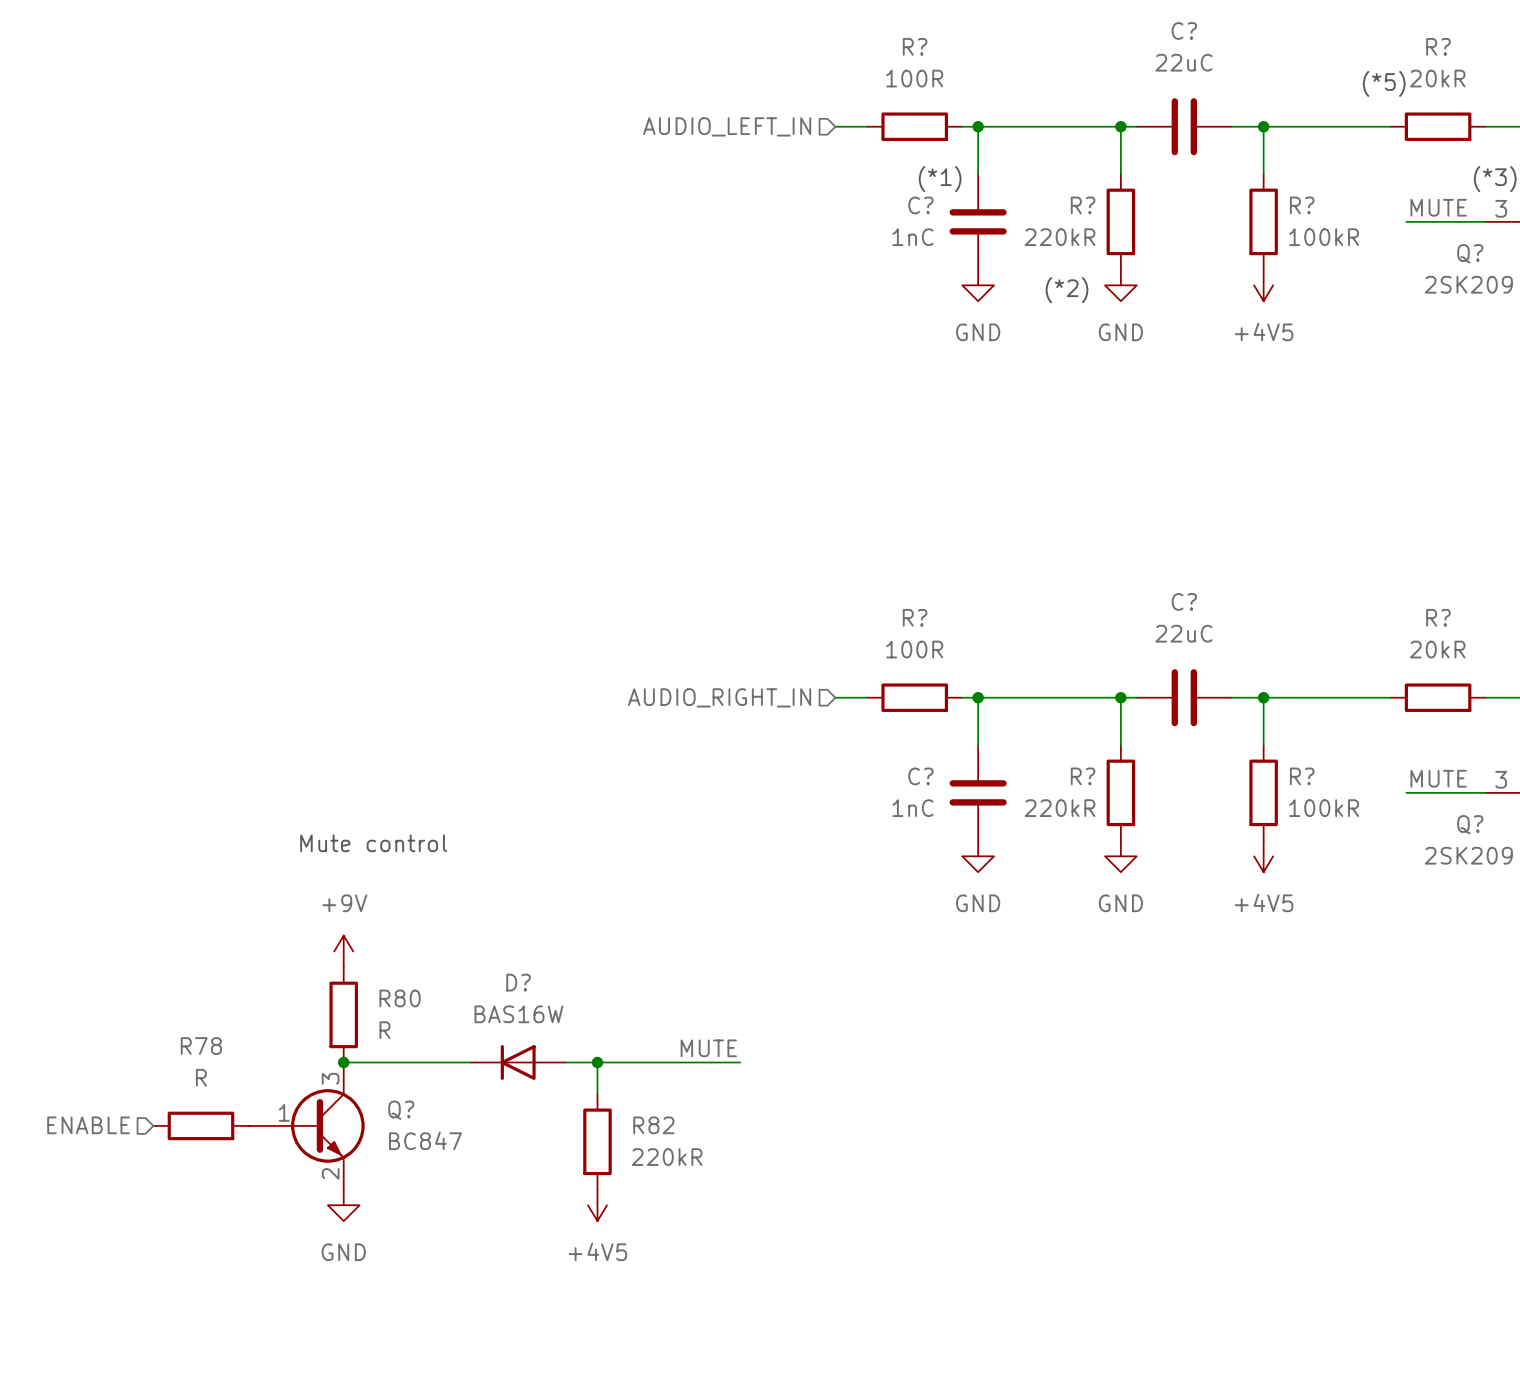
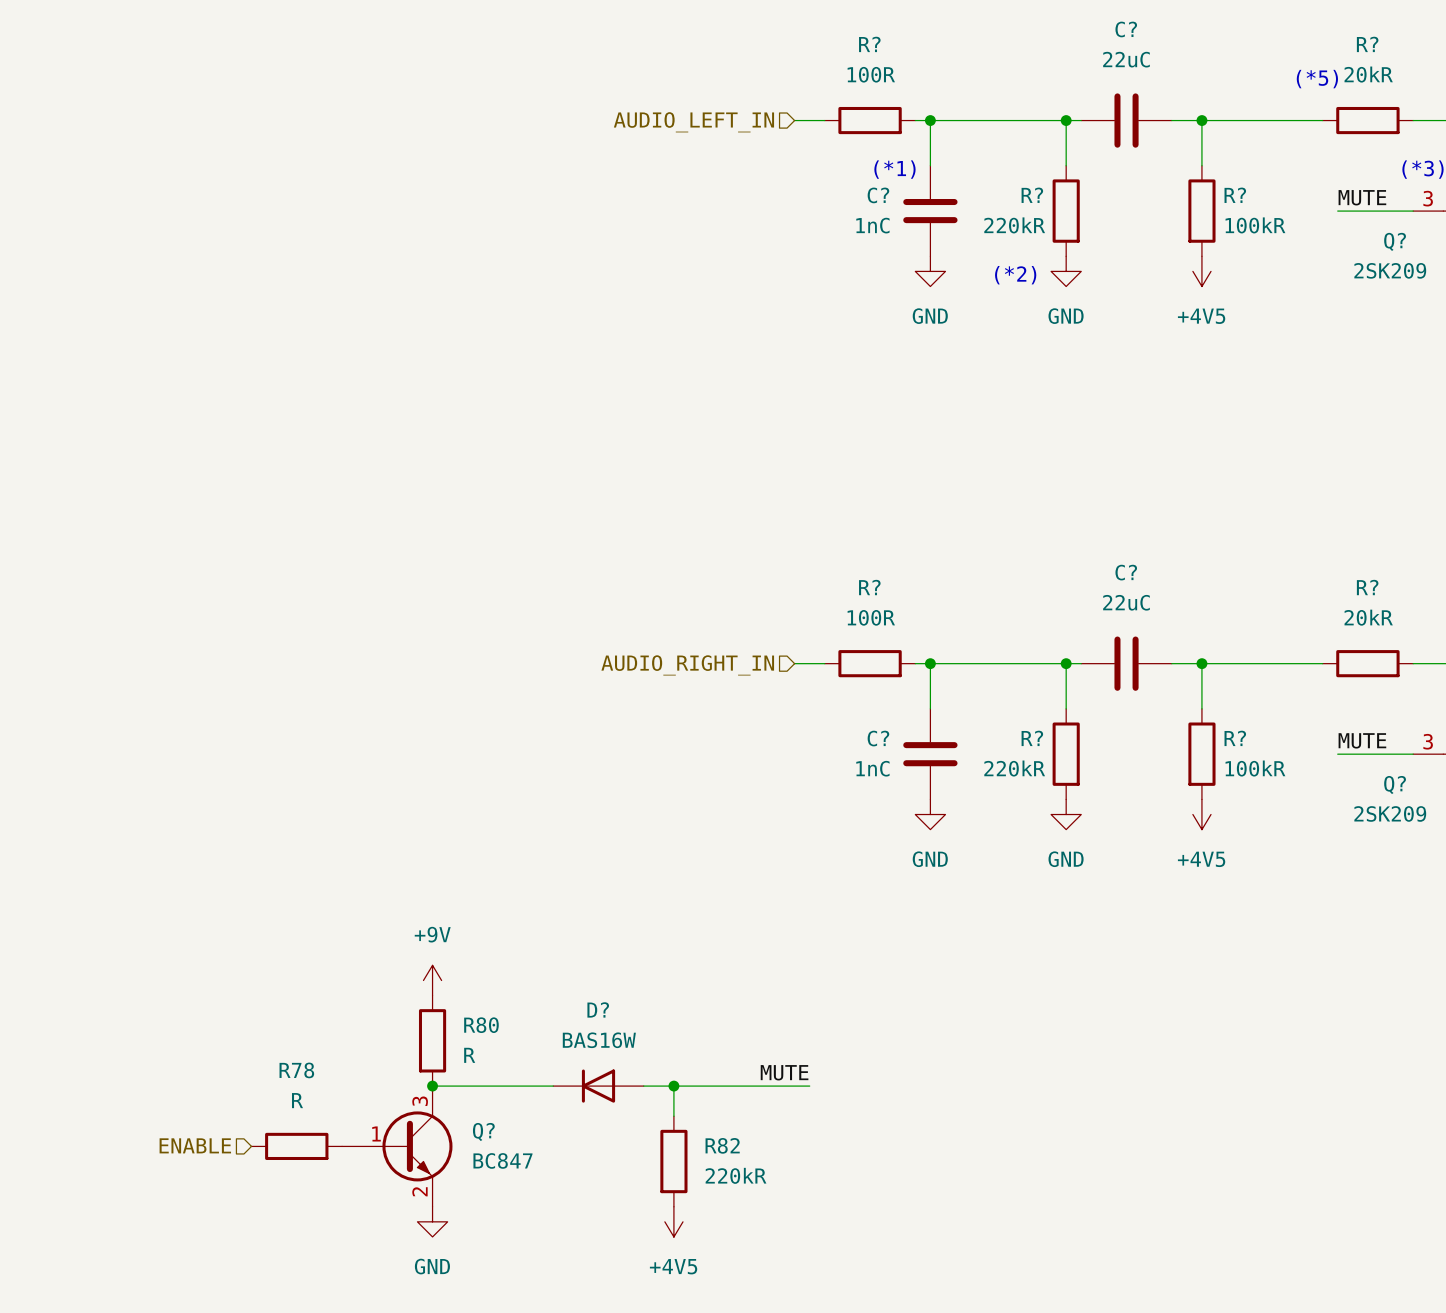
text: Mute control (373, 843) -> none
power symbol position: +9V (343, 951) -> +9V (432, 980)
R80 position: (343, 1014) -> (432, 1040)
label position: MUTE (708, 1048) -> MUTE (784, 1072)
wire: (343, 1062) (470, 1062) -> (432, 1086) (553, 1086)
junction: (343, 1062) -> none
D? position: (518, 1062) -> (598, 1086)
wire: (565, 1062) (740, 1062) -> (643, 1086) (809, 1086)
wire: (597, 1062) (597, 1094) -> (673, 1086) (673, 1116)
junction: (597, 1062) -> none
hierarchical label position: ENABLE (88, 1125) -> ENABLE (195, 1145)
R78 position: (200, 1125) -> (296, 1146)
Q? position: (306, 1125) -> (397, 1146)
junction: none -> (432, 1086)
R82 position: (597, 1141) -> (673, 1161)
junction: none -> (673, 1086)
power symbol position: GND (343, 1205) -> GND (432, 1221)
power symbol position: +4V5 (597, 1205) -> +4V5 (673, 1221)

